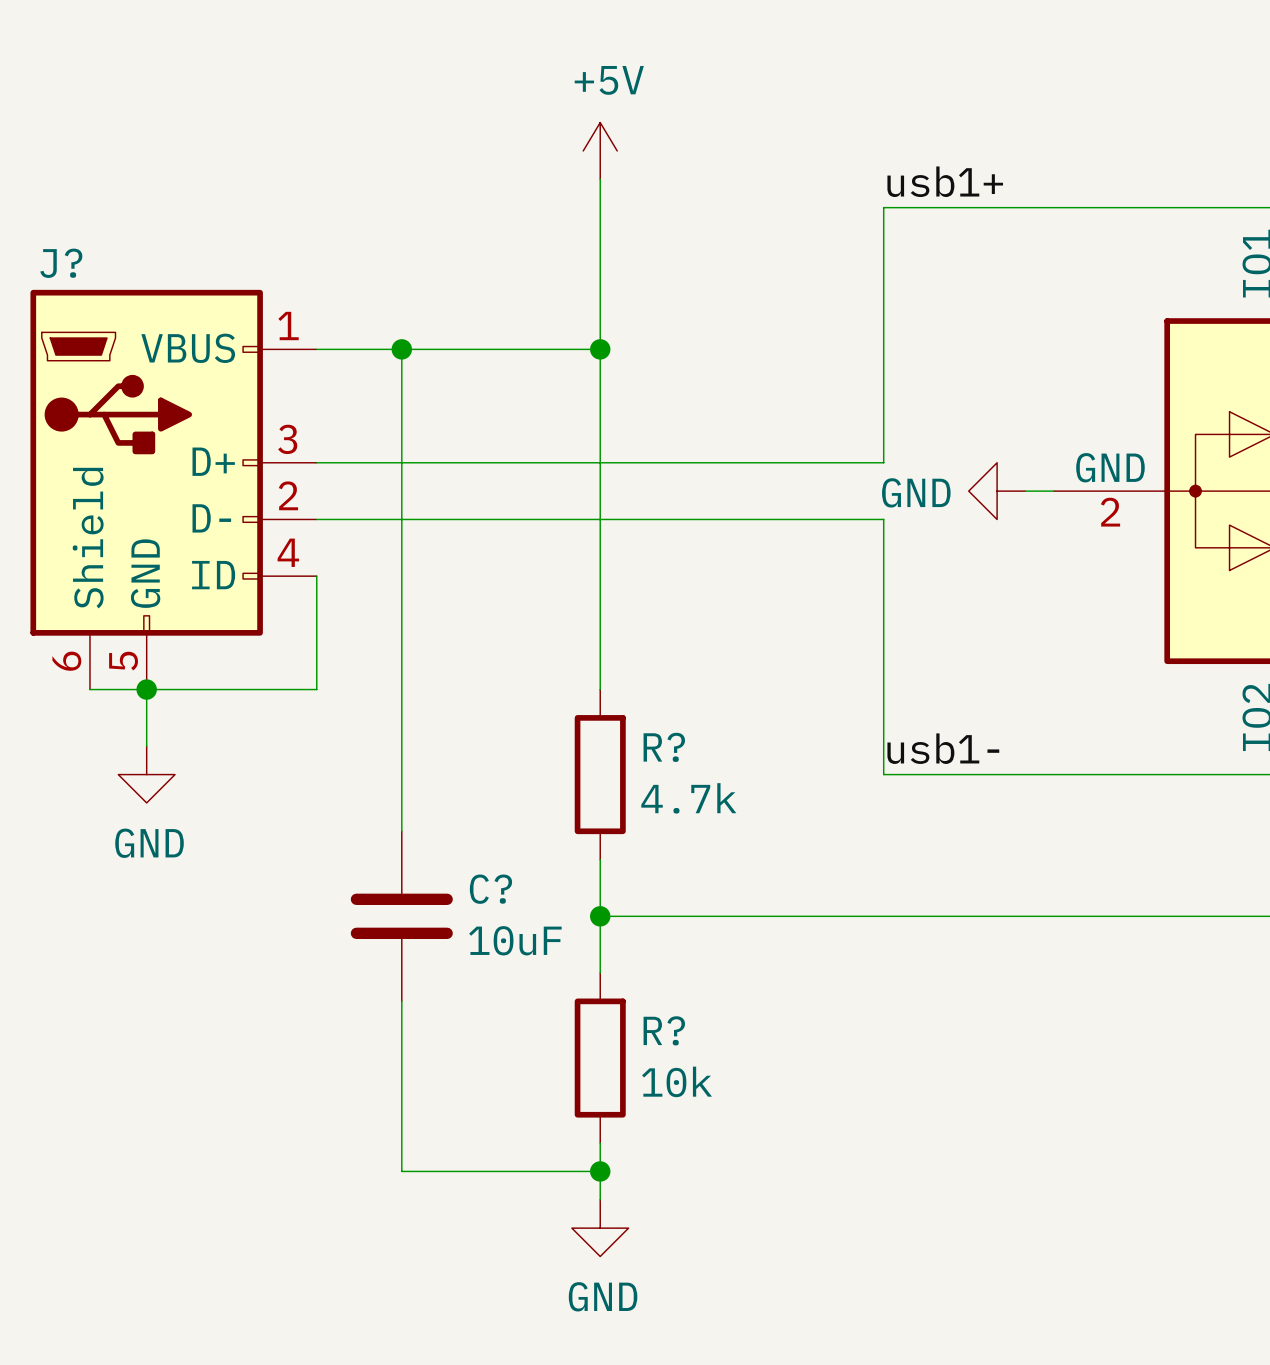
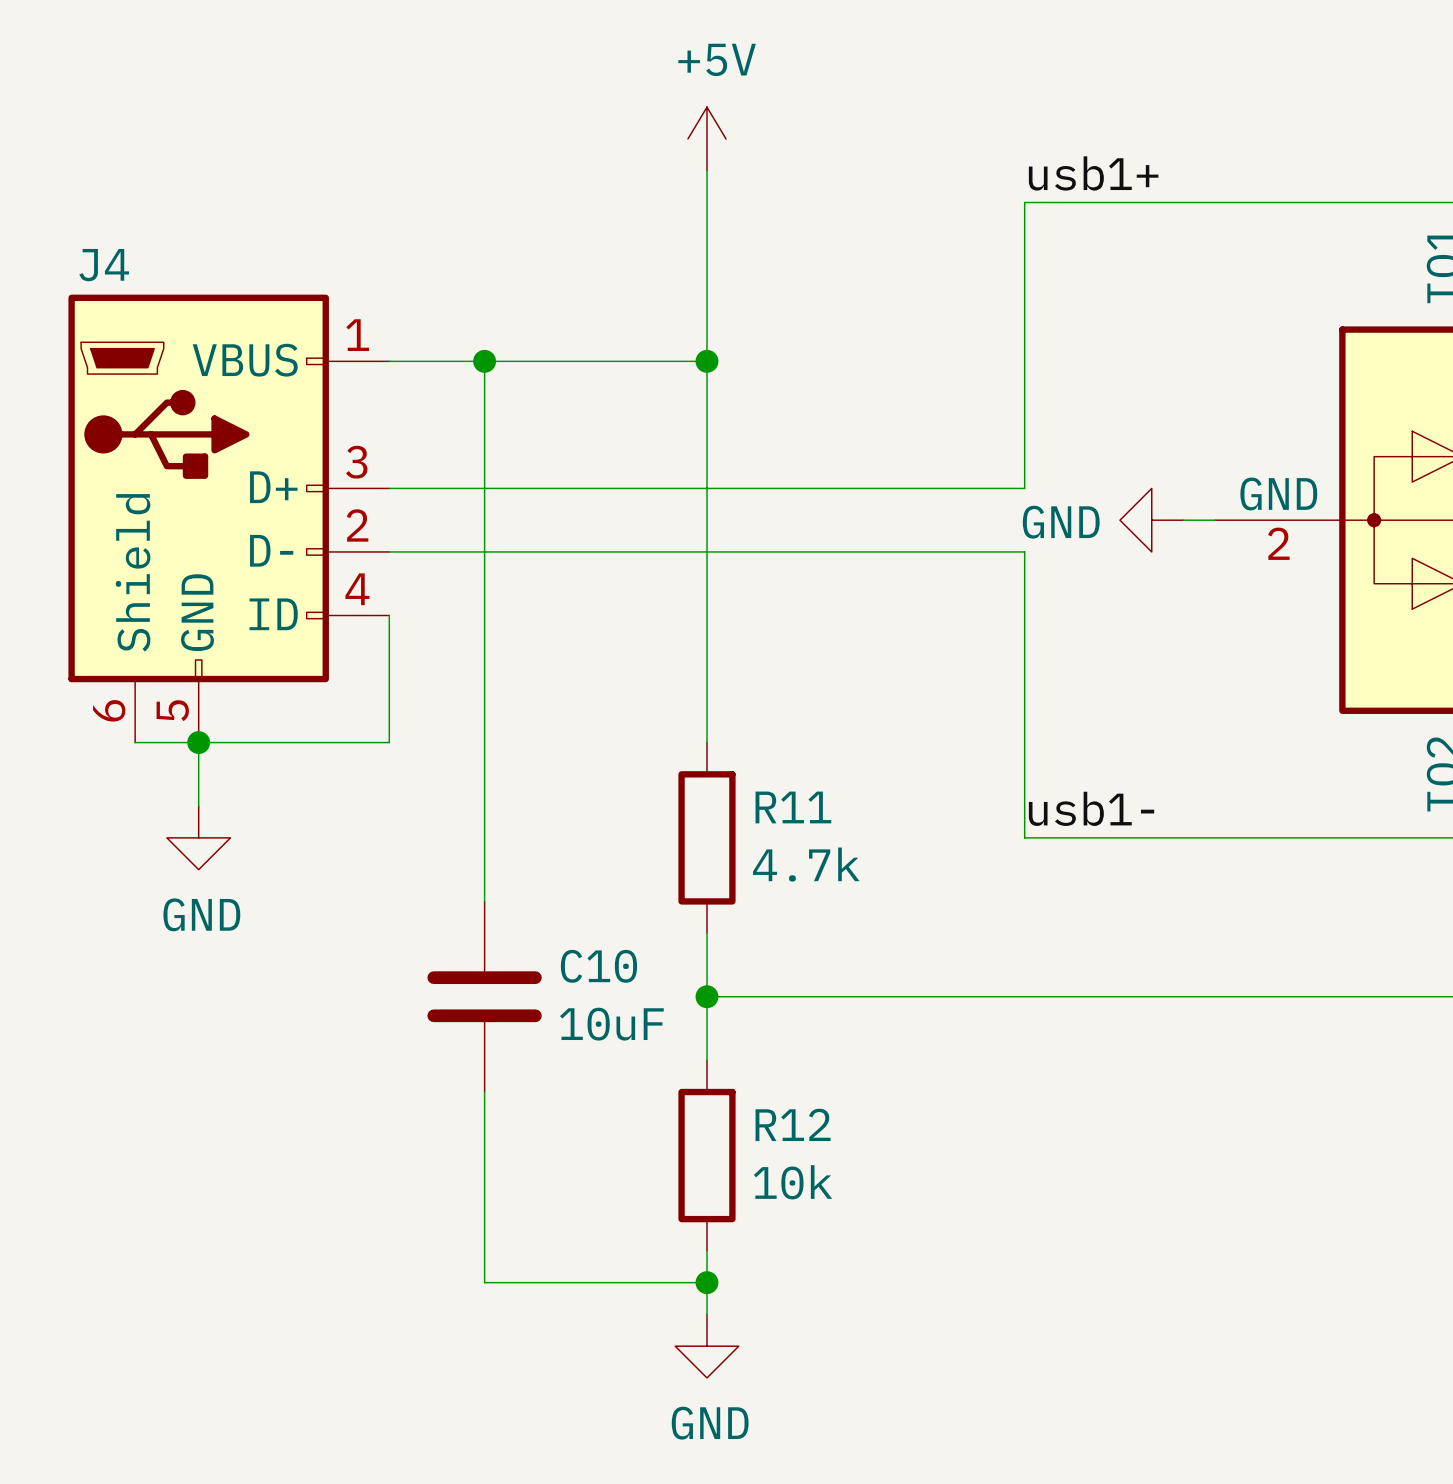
J? name: J? (61, 263) -> J4 (104, 265)
R? name: R? (664, 747) -> R11 (793, 807)
C? name: C? (490, 889) -> C10 (598, 966)
R? name: R? (664, 1030) -> R12 (793, 1124)

